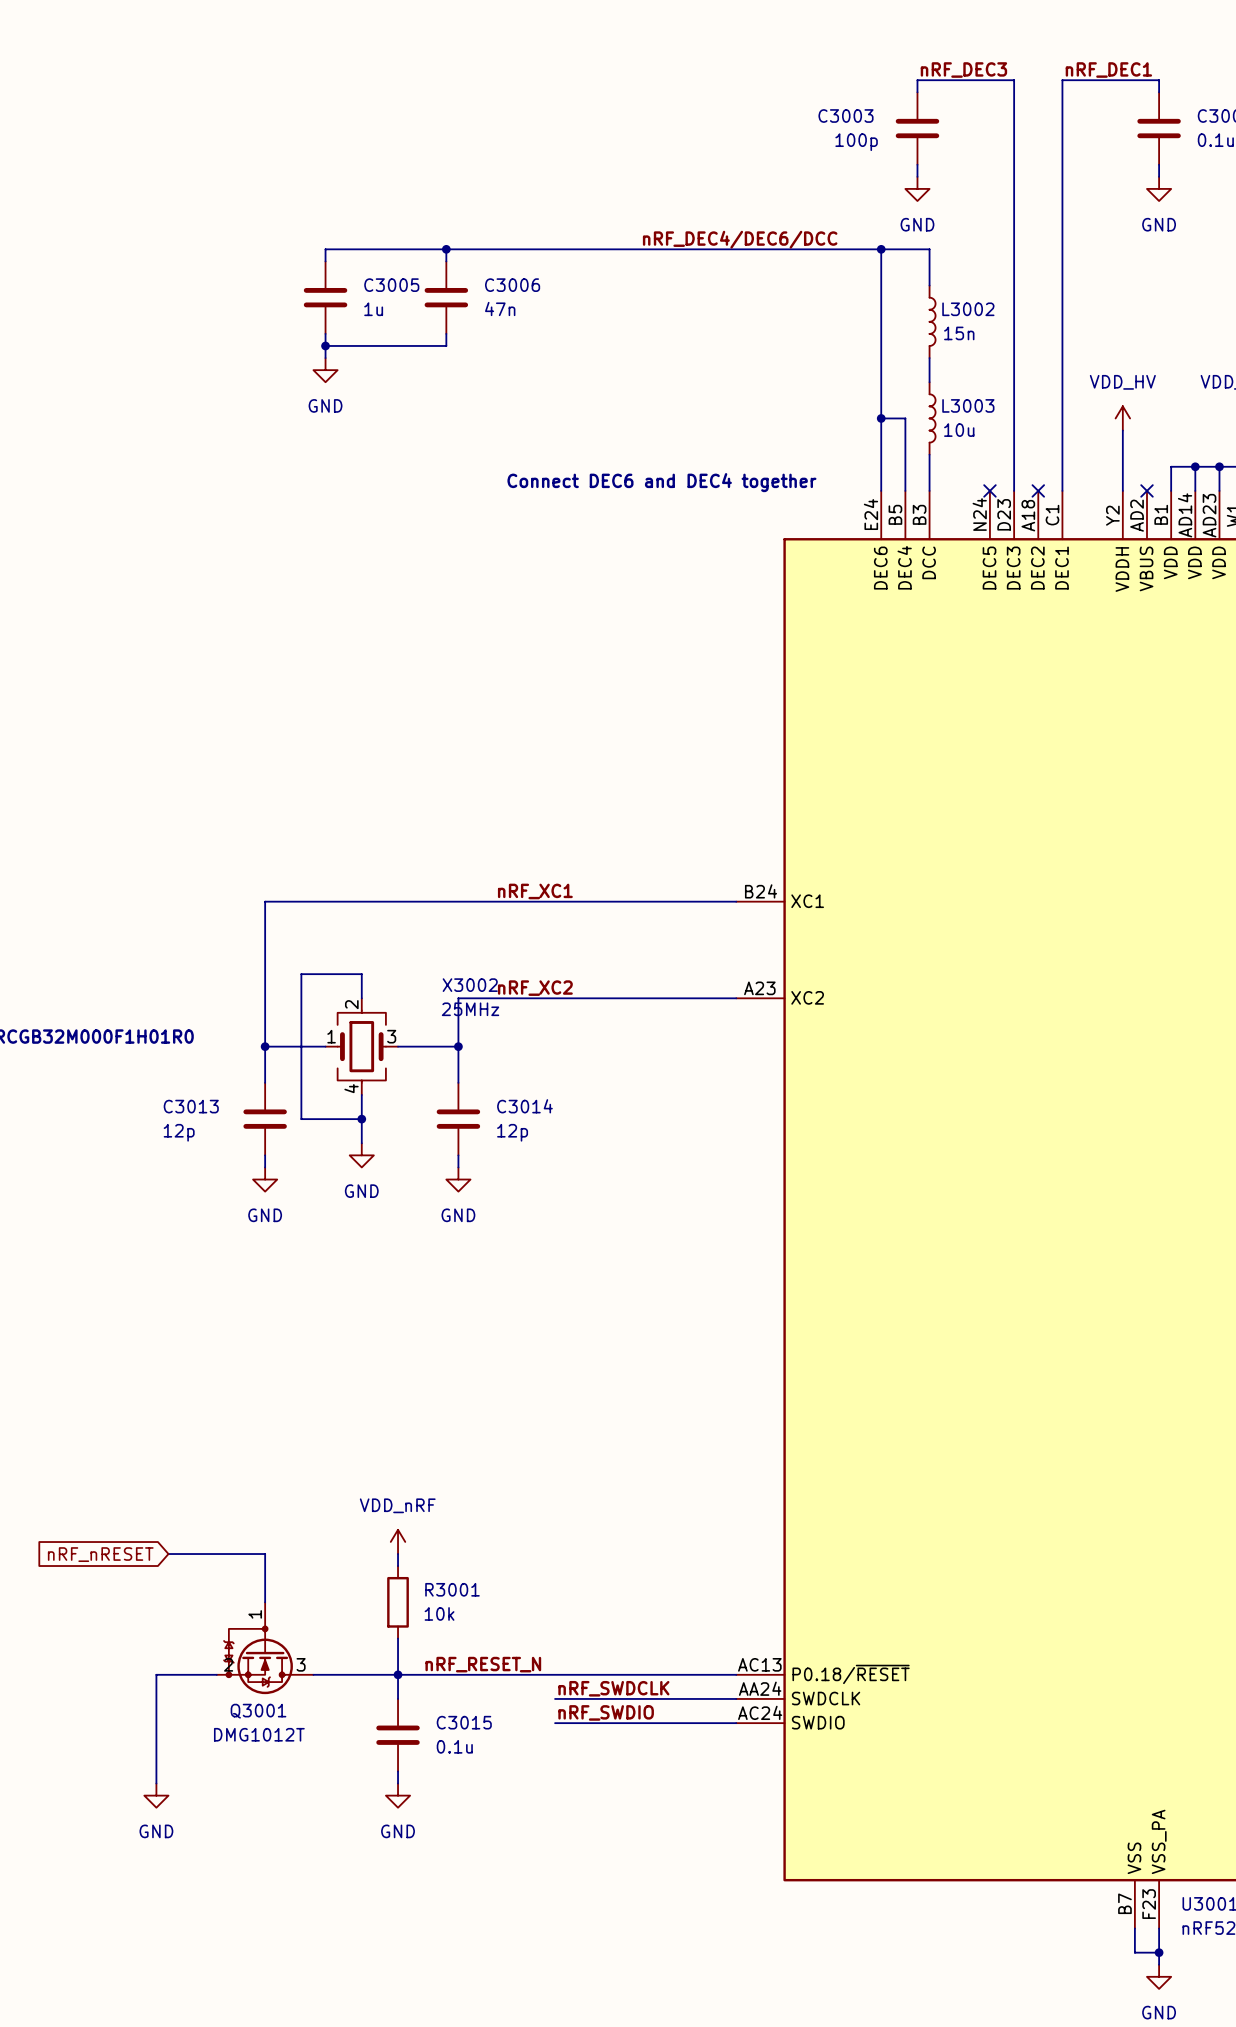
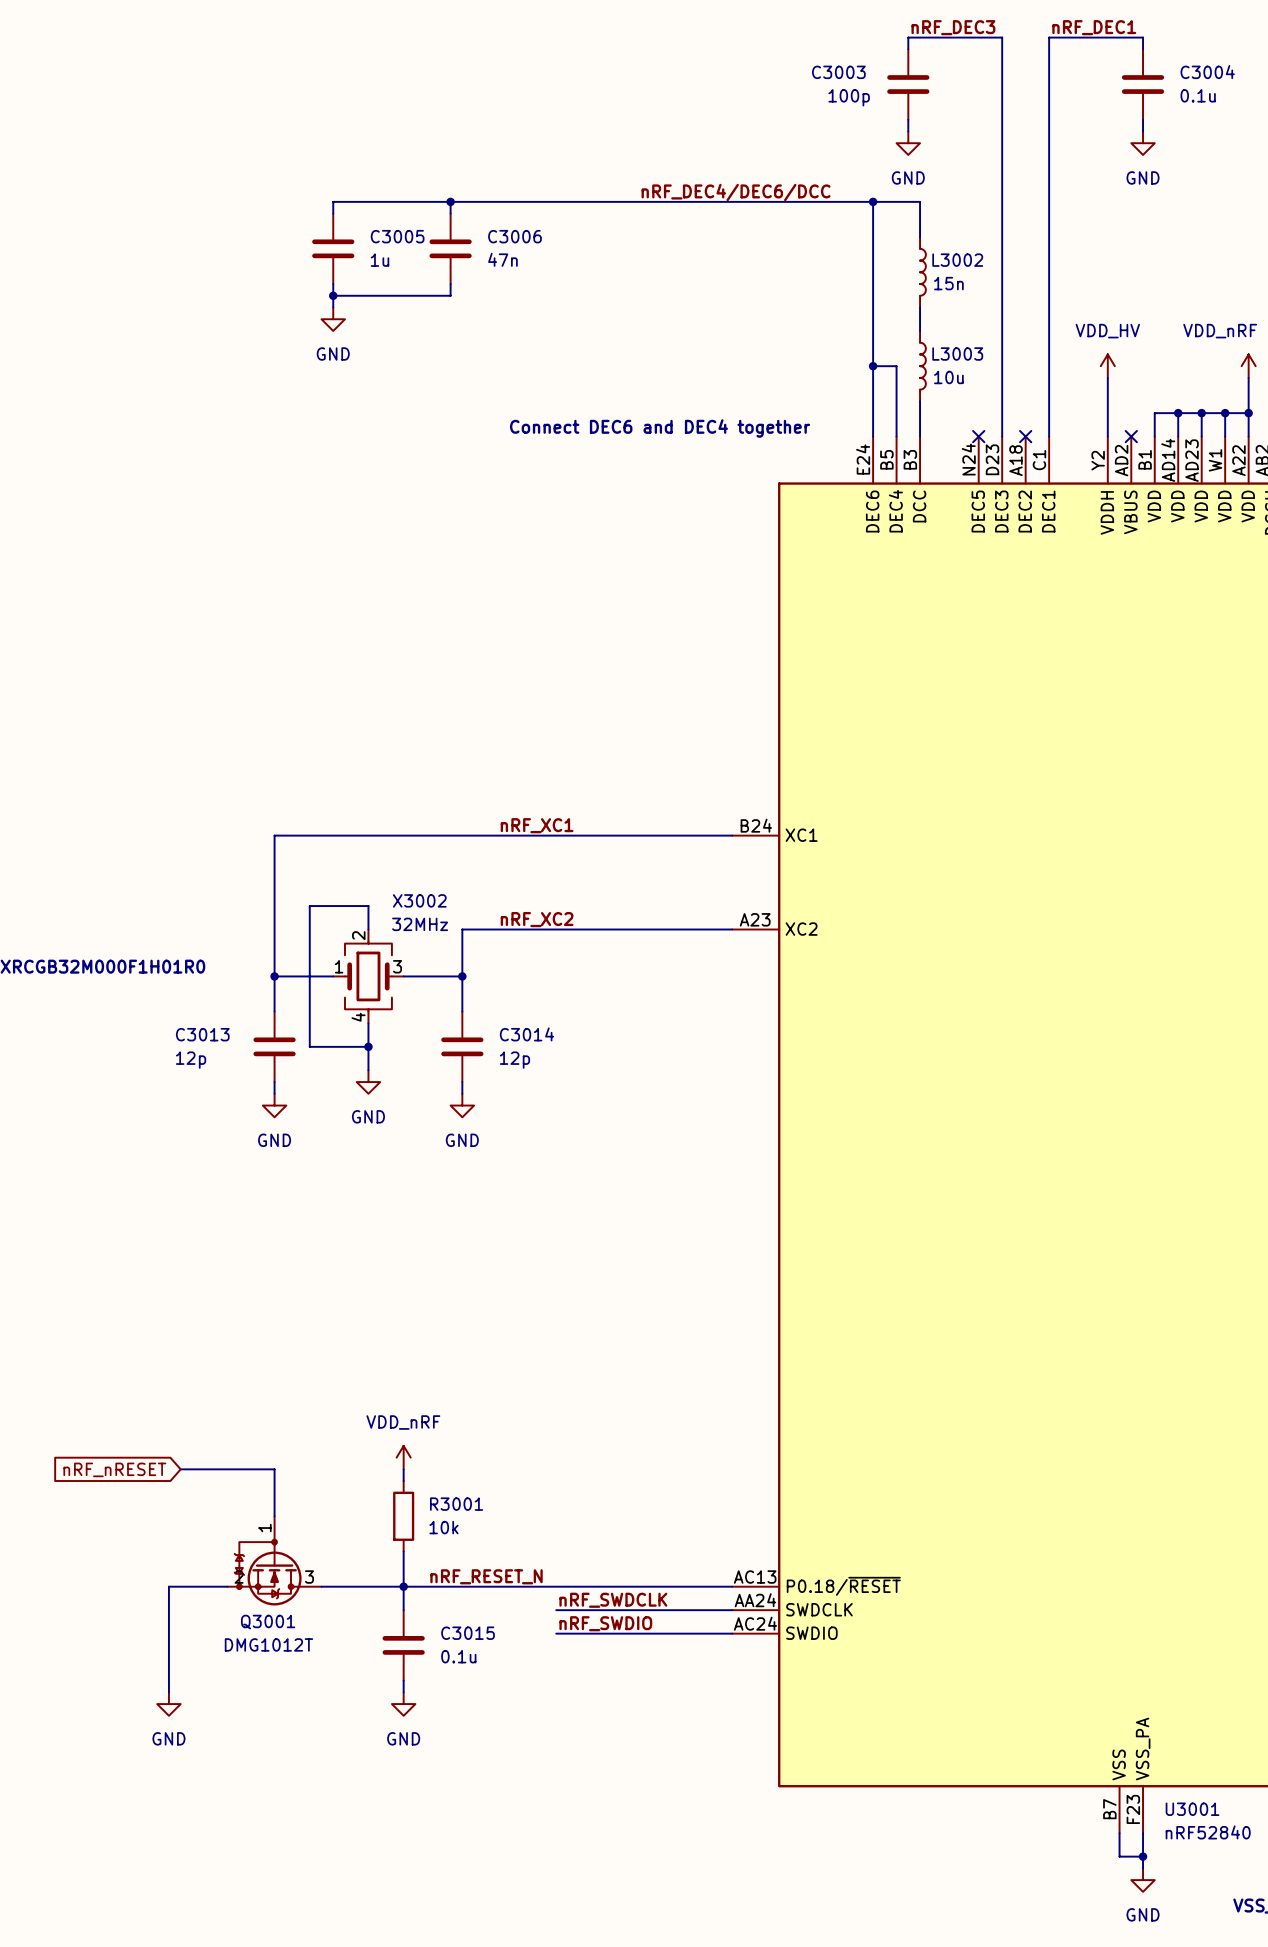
X3002 name position: X3002 (470, 985) -> X3002 (419, 900)
X3002 value: 25MHz (470, 1009) -> 32MHz (420, 924)

